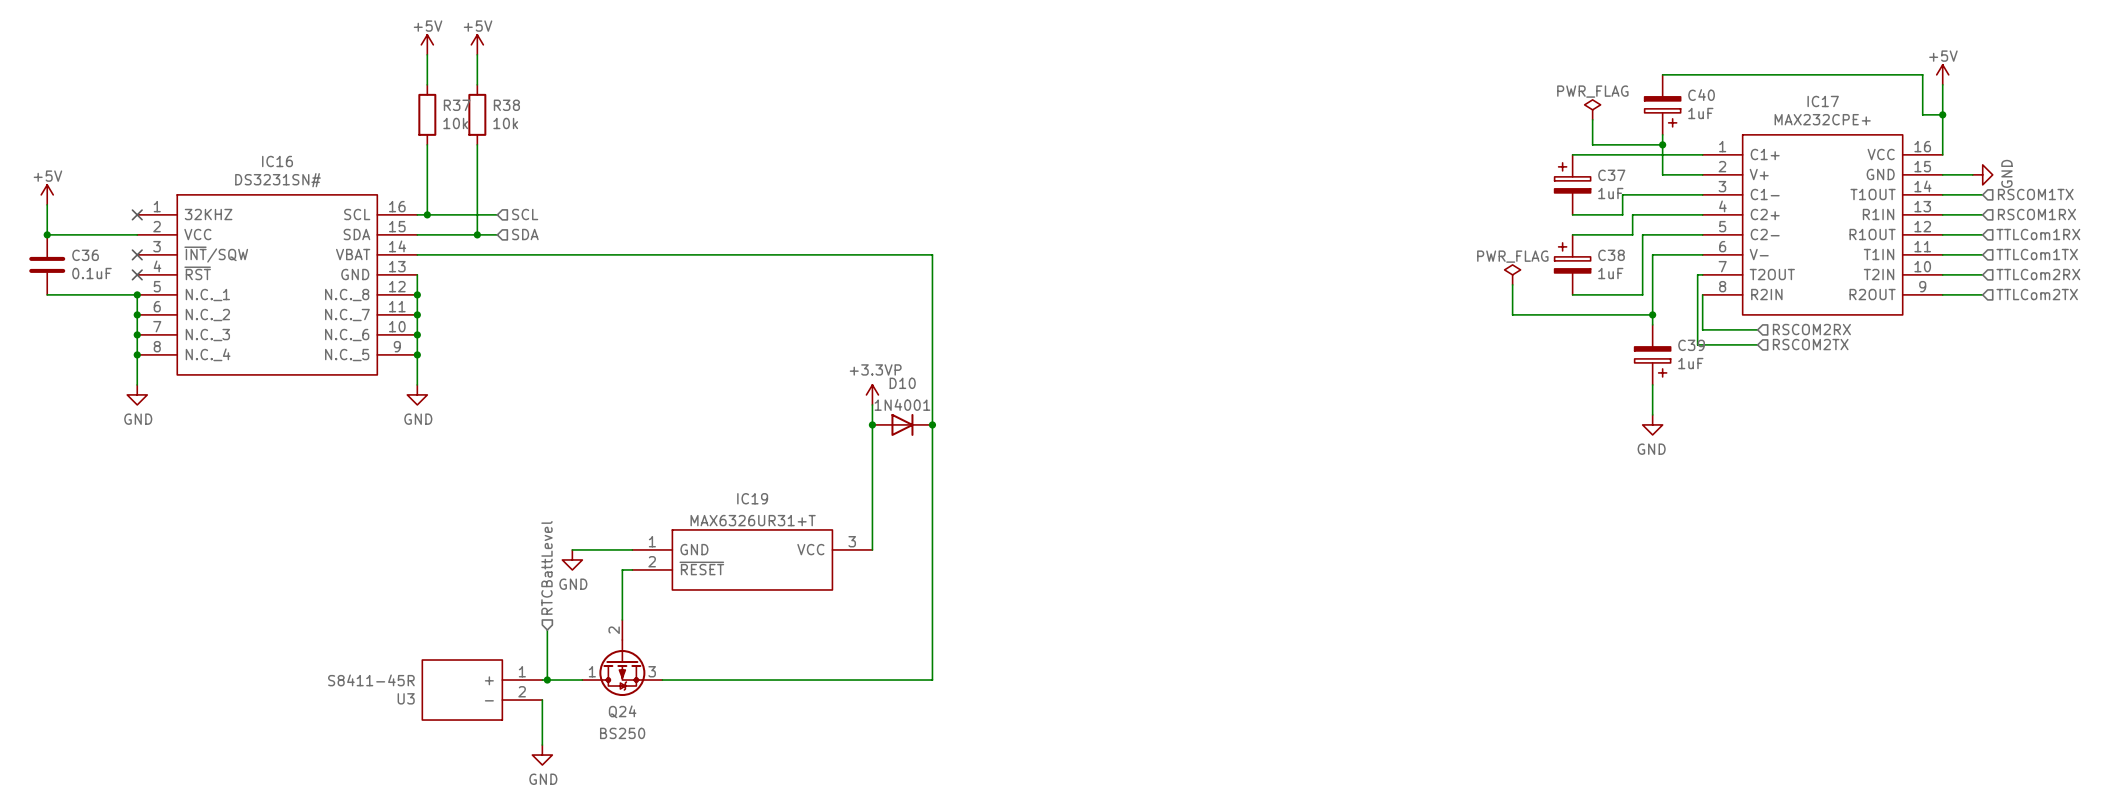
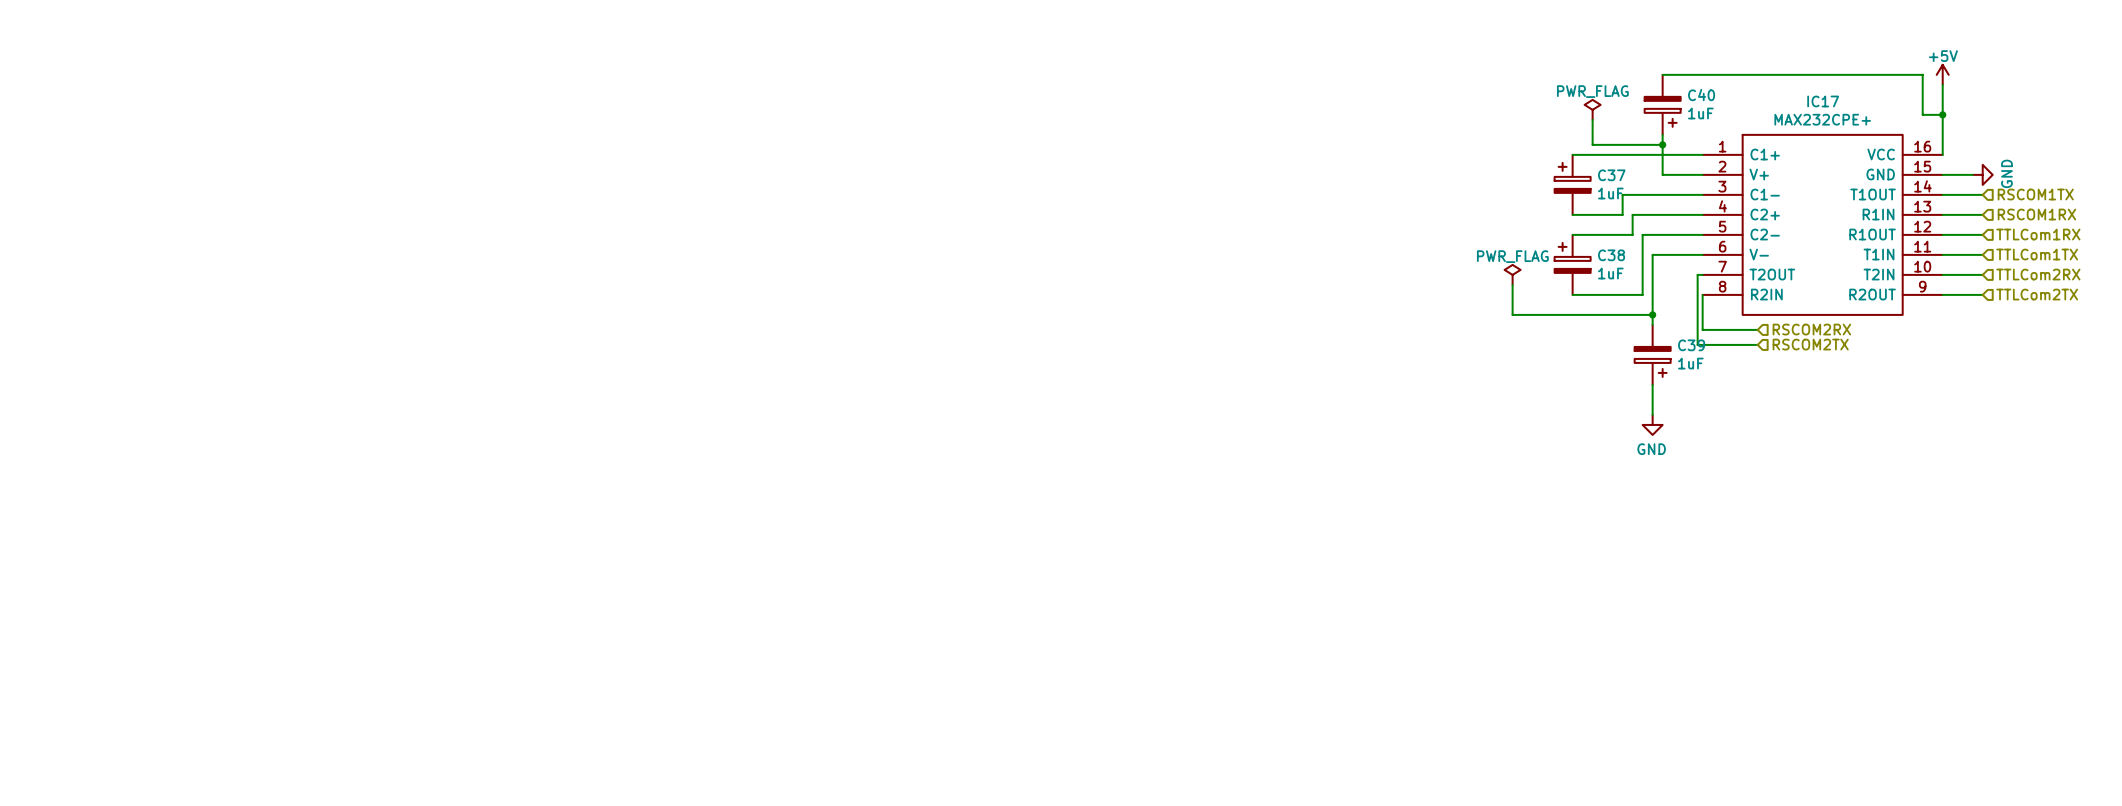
power symbol: +5V (427, 44) -> none
power symbol: +5V (477, 44) -> none
wire: (427, 54) (427, 84) -> none
wire: (477, 54) (477, 84) -> none
R37: 10k (427, 114) -> none
R38: 10k (477, 114) -> none
wire: (427, 144) (427, 214) -> none
wire: (477, 144) (477, 234) -> none
power symbol: +5V (47, 194) -> none
wire: (47, 204) (47, 234) (137, 234) -> none
no-connect mark: (137, 214) -> none
wire: (417, 214) (497, 214) -> none
junction: (427, 214) -> none
hierarchical label: SCL (525, 214) -> none
junction: (47, 234) -> none
wire: (417, 234) (497, 234) -> none
junction: (477, 234) -> none
hierarchical label: SDA (525, 234) -> none
no-connect mark: (137, 254) -> none
wire: (417, 254) (932, 254) (932, 680) (662, 680) -> none
C36: 0.1uF (47, 264) -> none
no-connect mark: (137, 274) -> none
wire: (417, 274) (417, 384) -> none
IC16: DS3231SN# (277, 284) -> none
wire: (47, 294) (137, 294) (137, 384) -> none
junction: (137, 294) -> none
junction: (417, 294) -> none
junction: (137, 314) -> none
junction: (417, 314) -> none
junction: (137, 334) -> none
junction: (417, 334) -> none
junction: (137, 354) -> none
junction: (417, 354) -> none
power symbol: GND (137, 394) -> none
power symbol: GND (417, 394) -> none
power symbol: +3.3VP (872, 394) -> none
wire: (872, 404) (872, 549) -> none
junction: (872, 424) -> none
D10: 1N4001 (902, 424) -> none
junction: (932, 424) -> none
wire: (572, 549) (632, 549) -> none
power symbol: GND (572, 559) -> none
IC19: MAX6326UR31+T (752, 559) -> none
hierarchical label: RTCBattLevel (546, 567) -> none
wire: (632, 569) (622, 569) (622, 619) -> none
wire: (547, 629) (547, 680) -> none
Q24: BS250 (622, 658) -> none
wire: (542, 680) (582, 680) -> none
junction: (547, 680) -> none
U3: S8411-45R (482, 690) -> none
wire: (542, 700) (542, 745) -> none
power symbol: GND (542, 755) -> none

